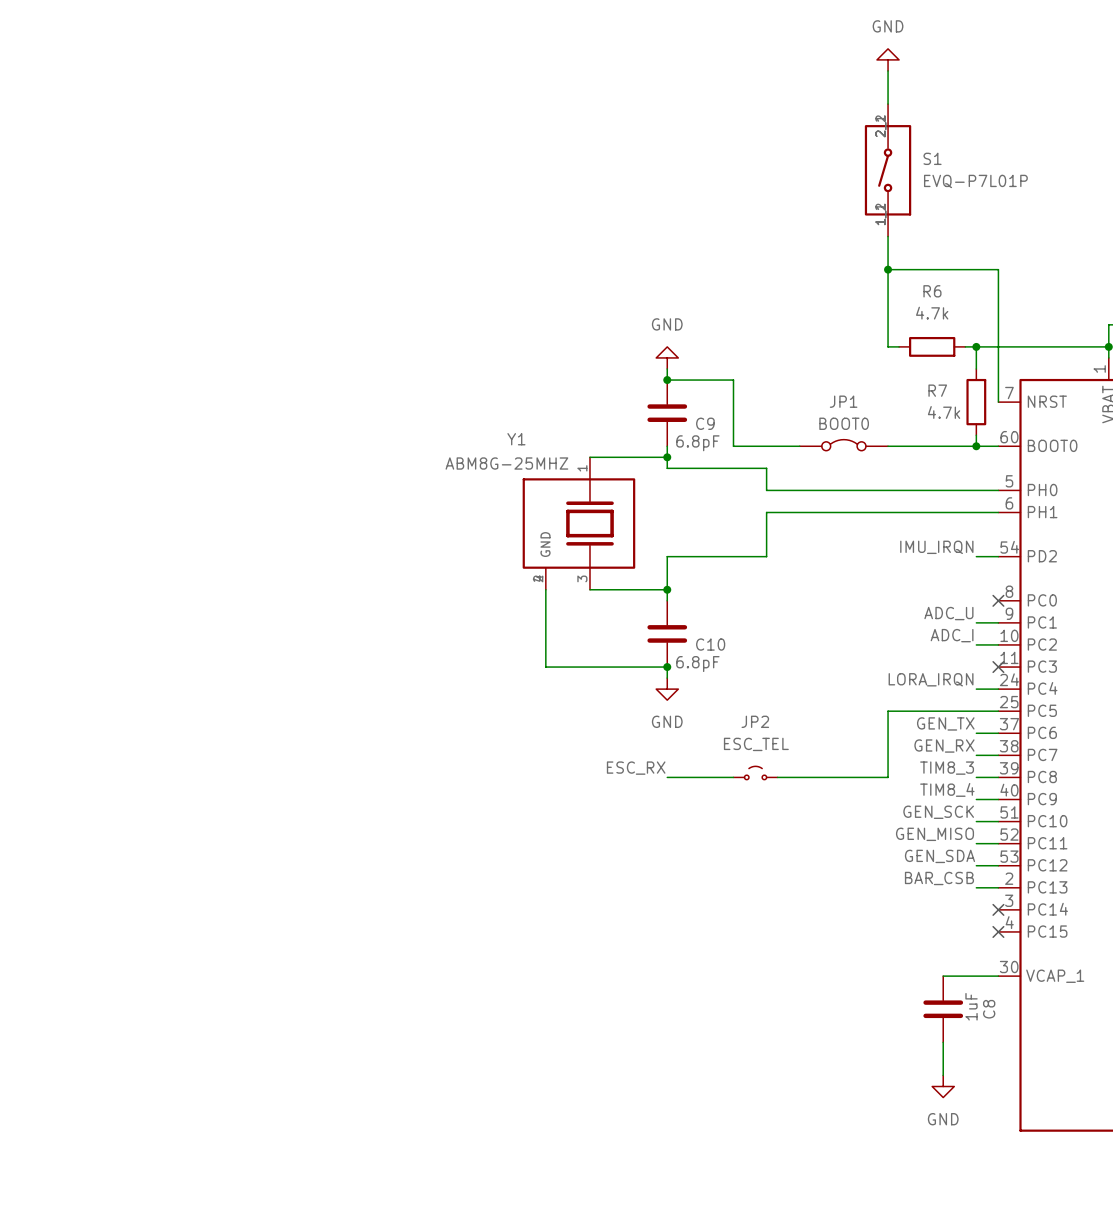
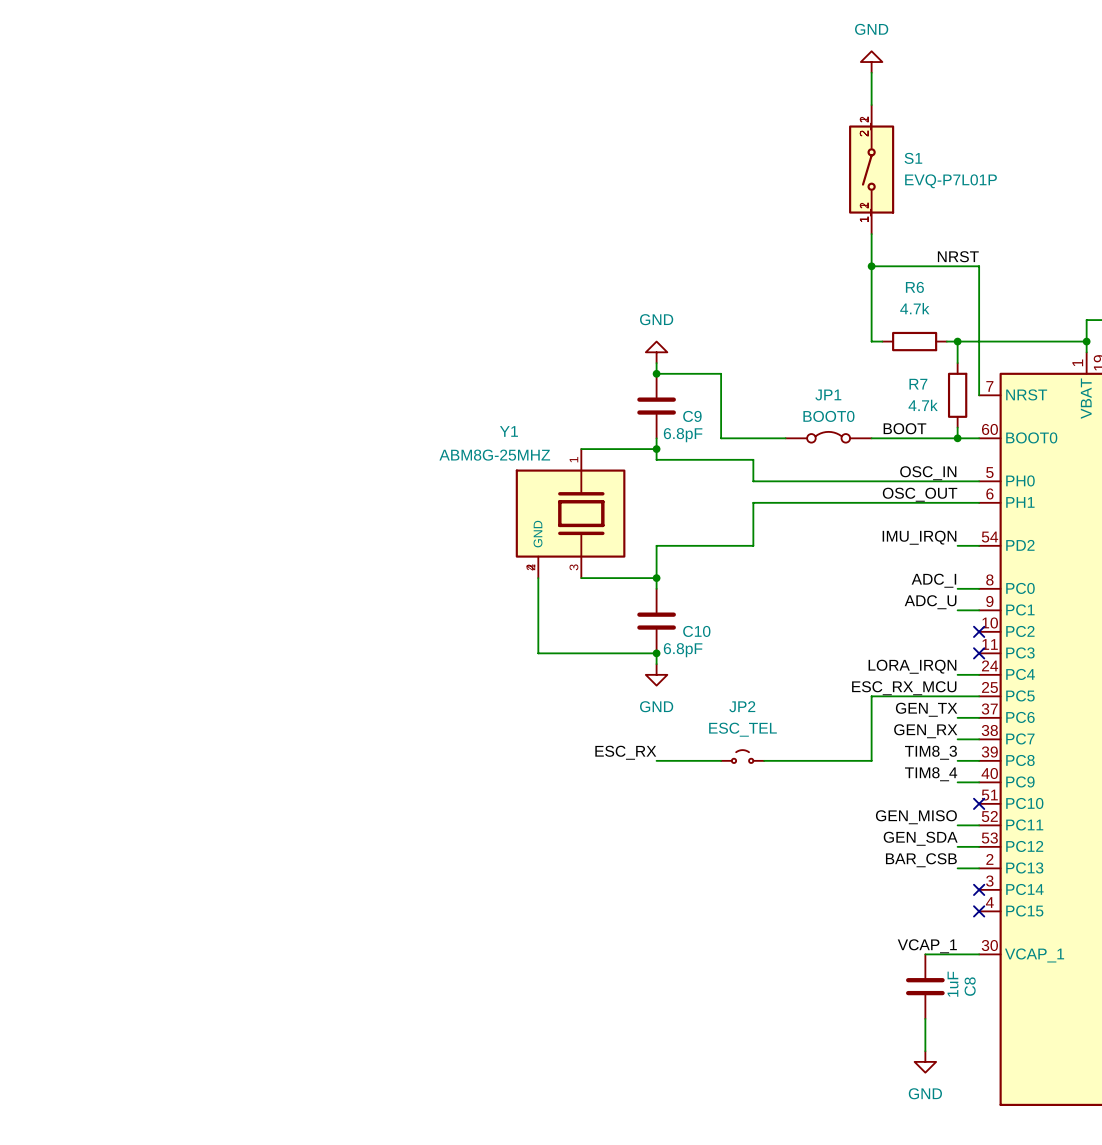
label: none -> NRST (958, 256)
label: none -> BOOT (904, 428)
label: none -> OSC_IN (928, 473)
label: none -> OSC_OUT (920, 494)
no-connect mark position: (998, 600) -> (979, 631)
label position: ADC_I (952, 635) -> ADC_I (933, 580)
wire: (976, 644) (998, 644) -> (957, 588) (979, 588)
label: none -> ESC_RX_MCU (904, 688)
label: GEN_SCK (938, 812) -> none
wire: (976, 821) (998, 821) -> none
no-connect mark: none -> (979, 803)
label: none -> VCAP_1 (927, 946)

